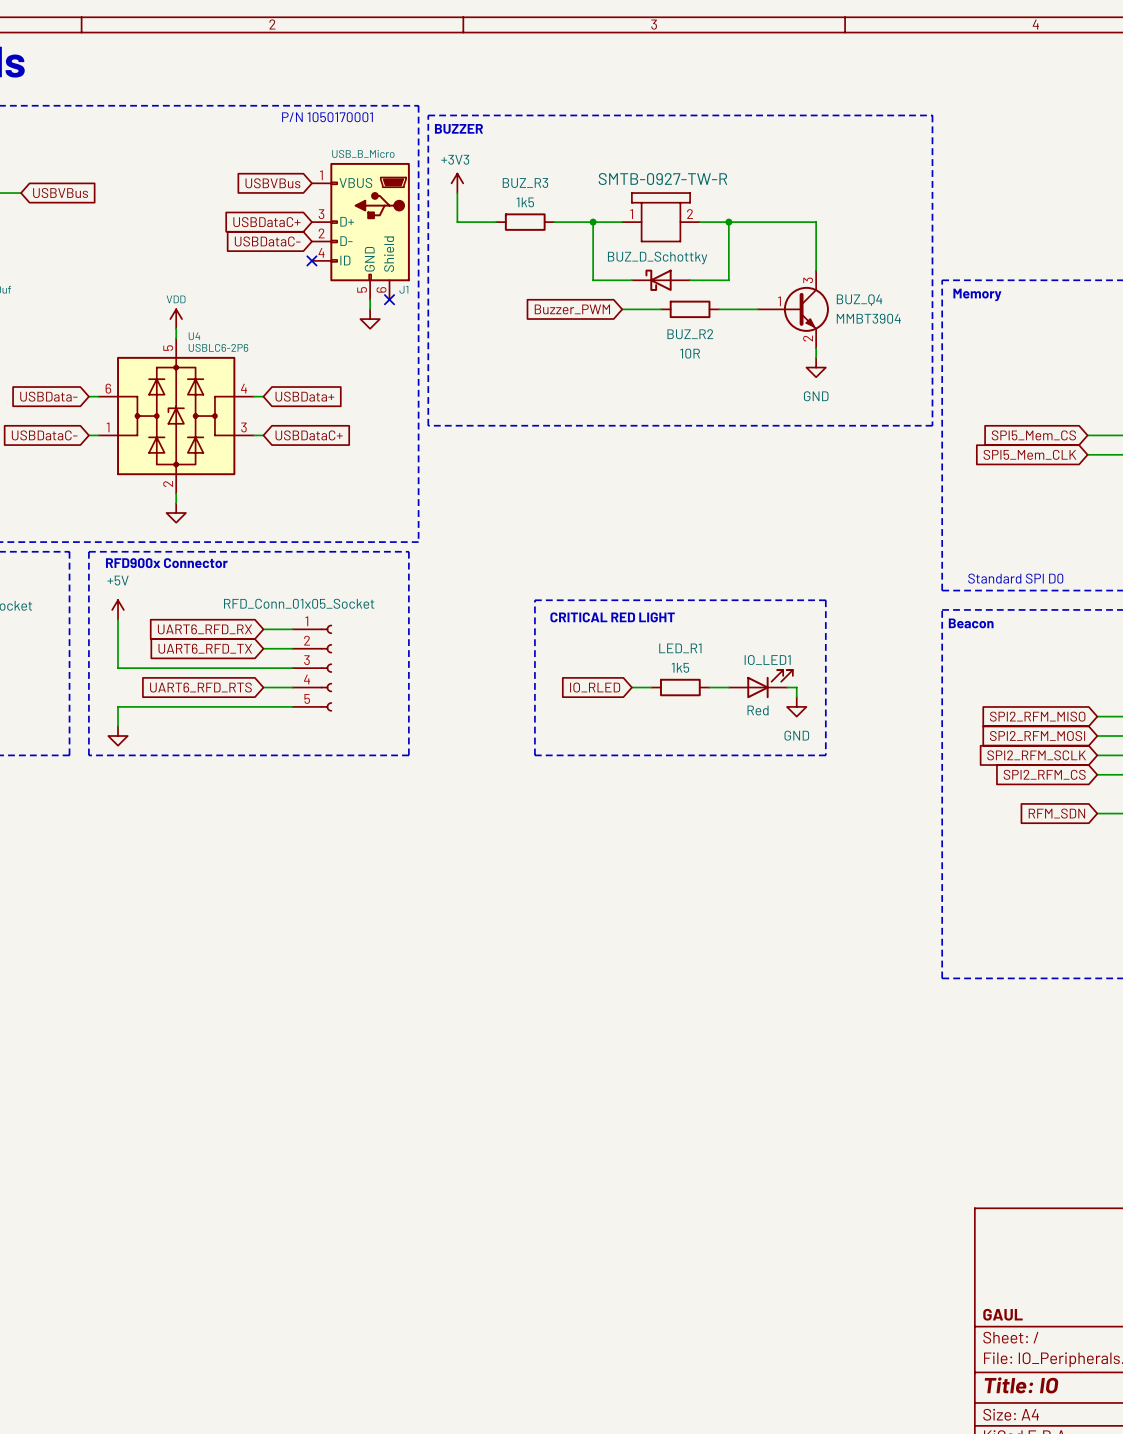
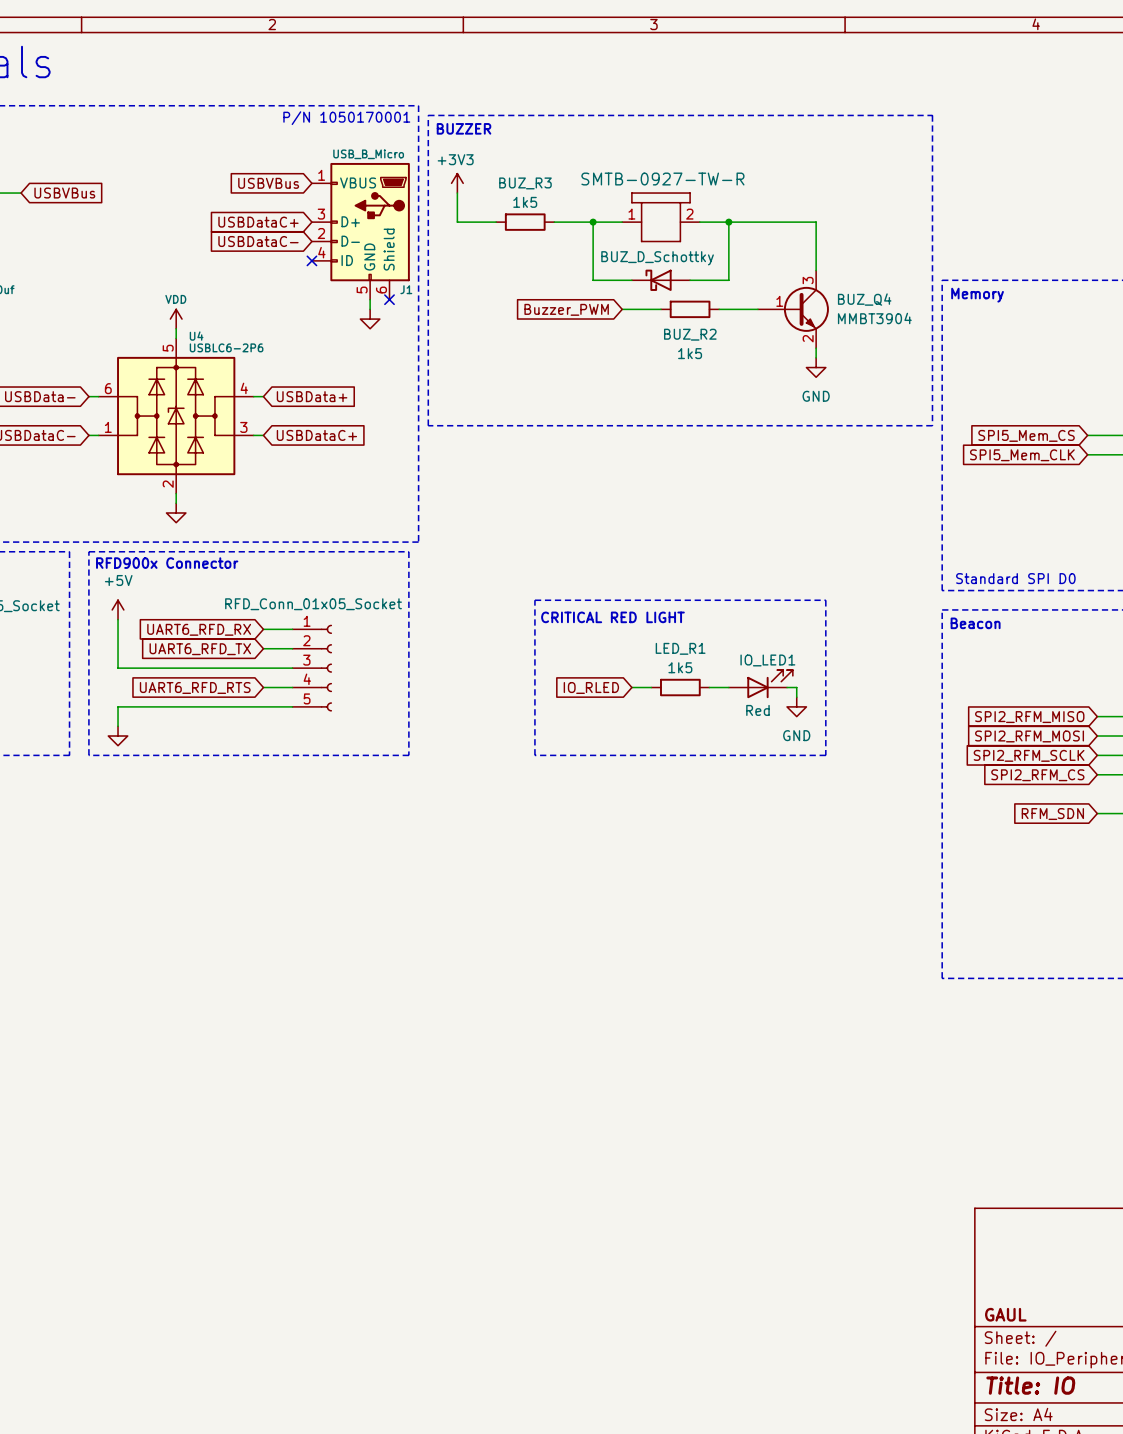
BUZ_R2 value: 10R (690, 353) -> 1k5 (690, 353)

